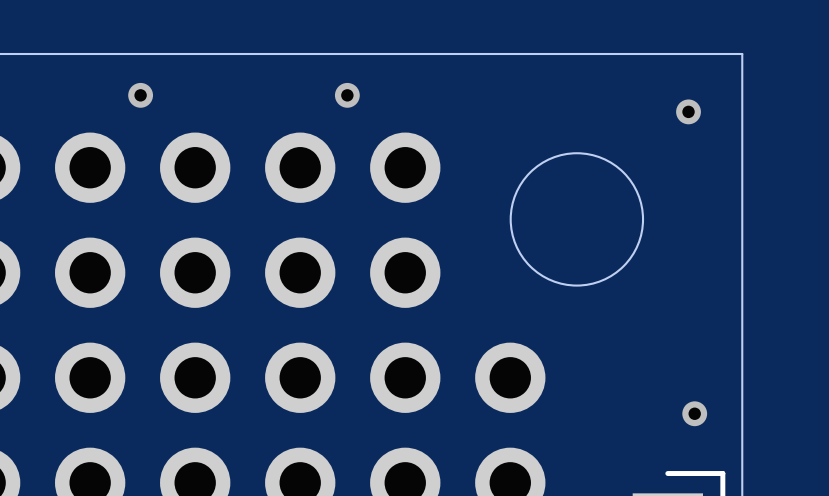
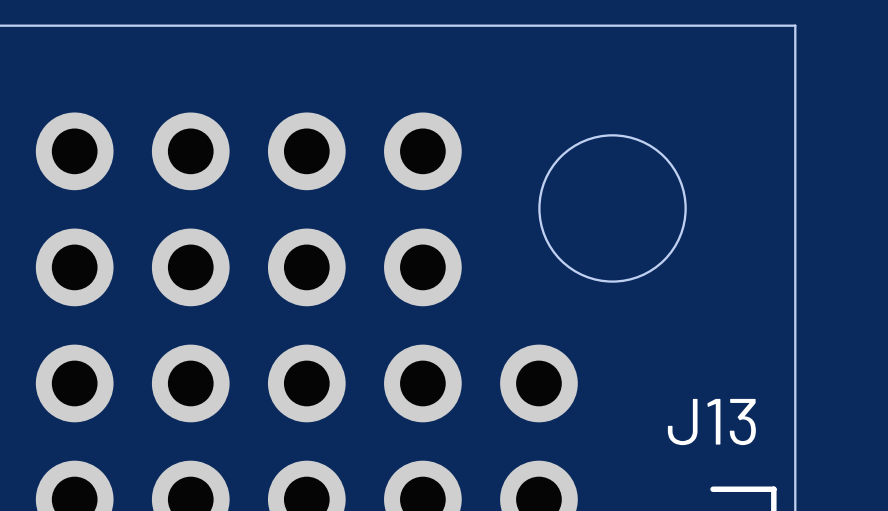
via: (140, 95) -> none
via: (347, 95) -> none
via: (688, 111) -> none
J13 name: none -> J13 (711, 422)
via: (694, 413) -> none

